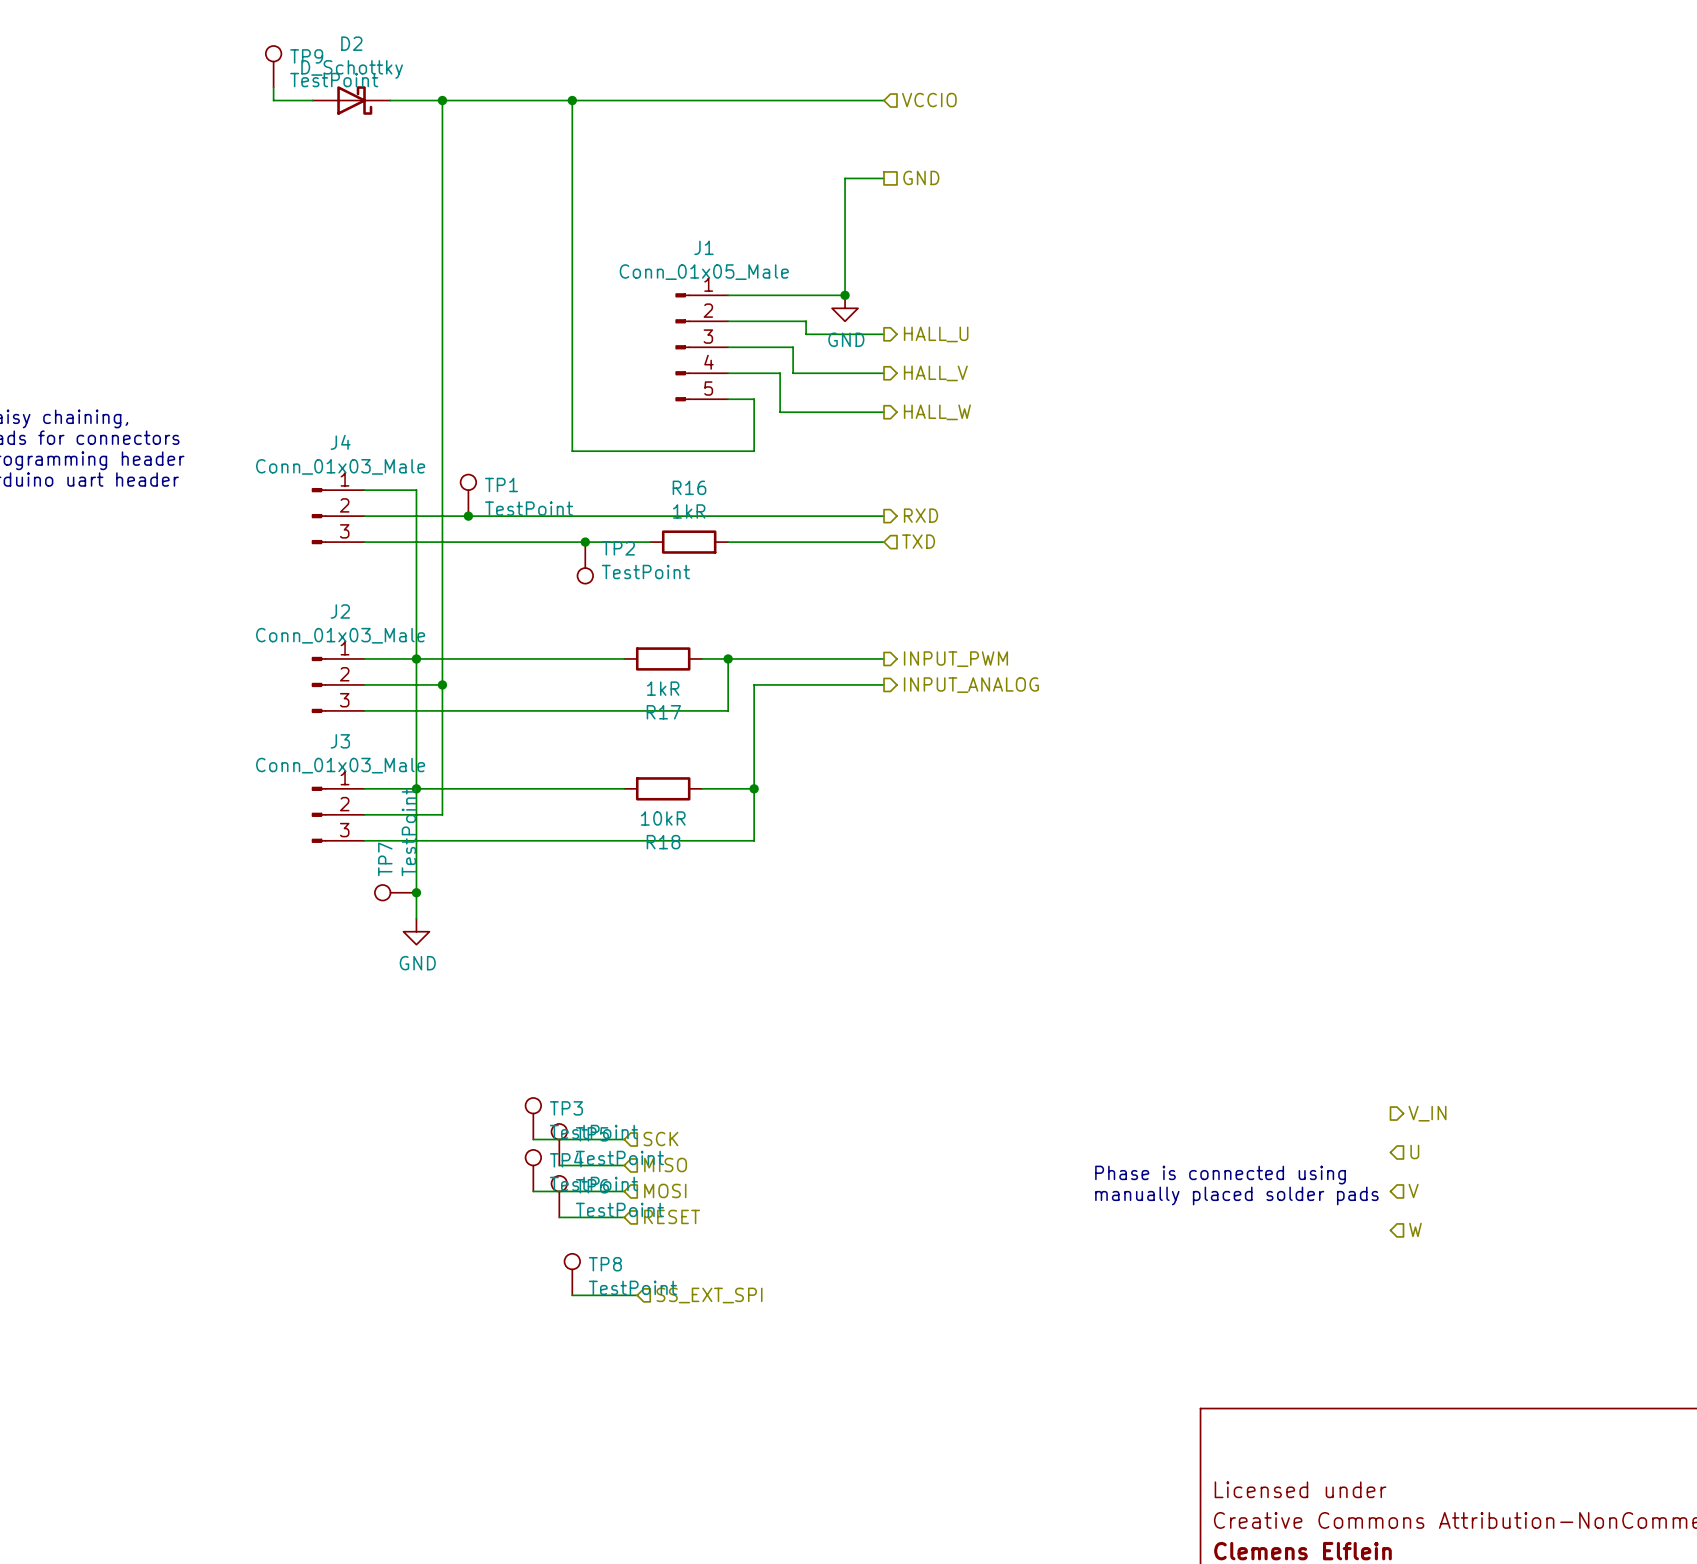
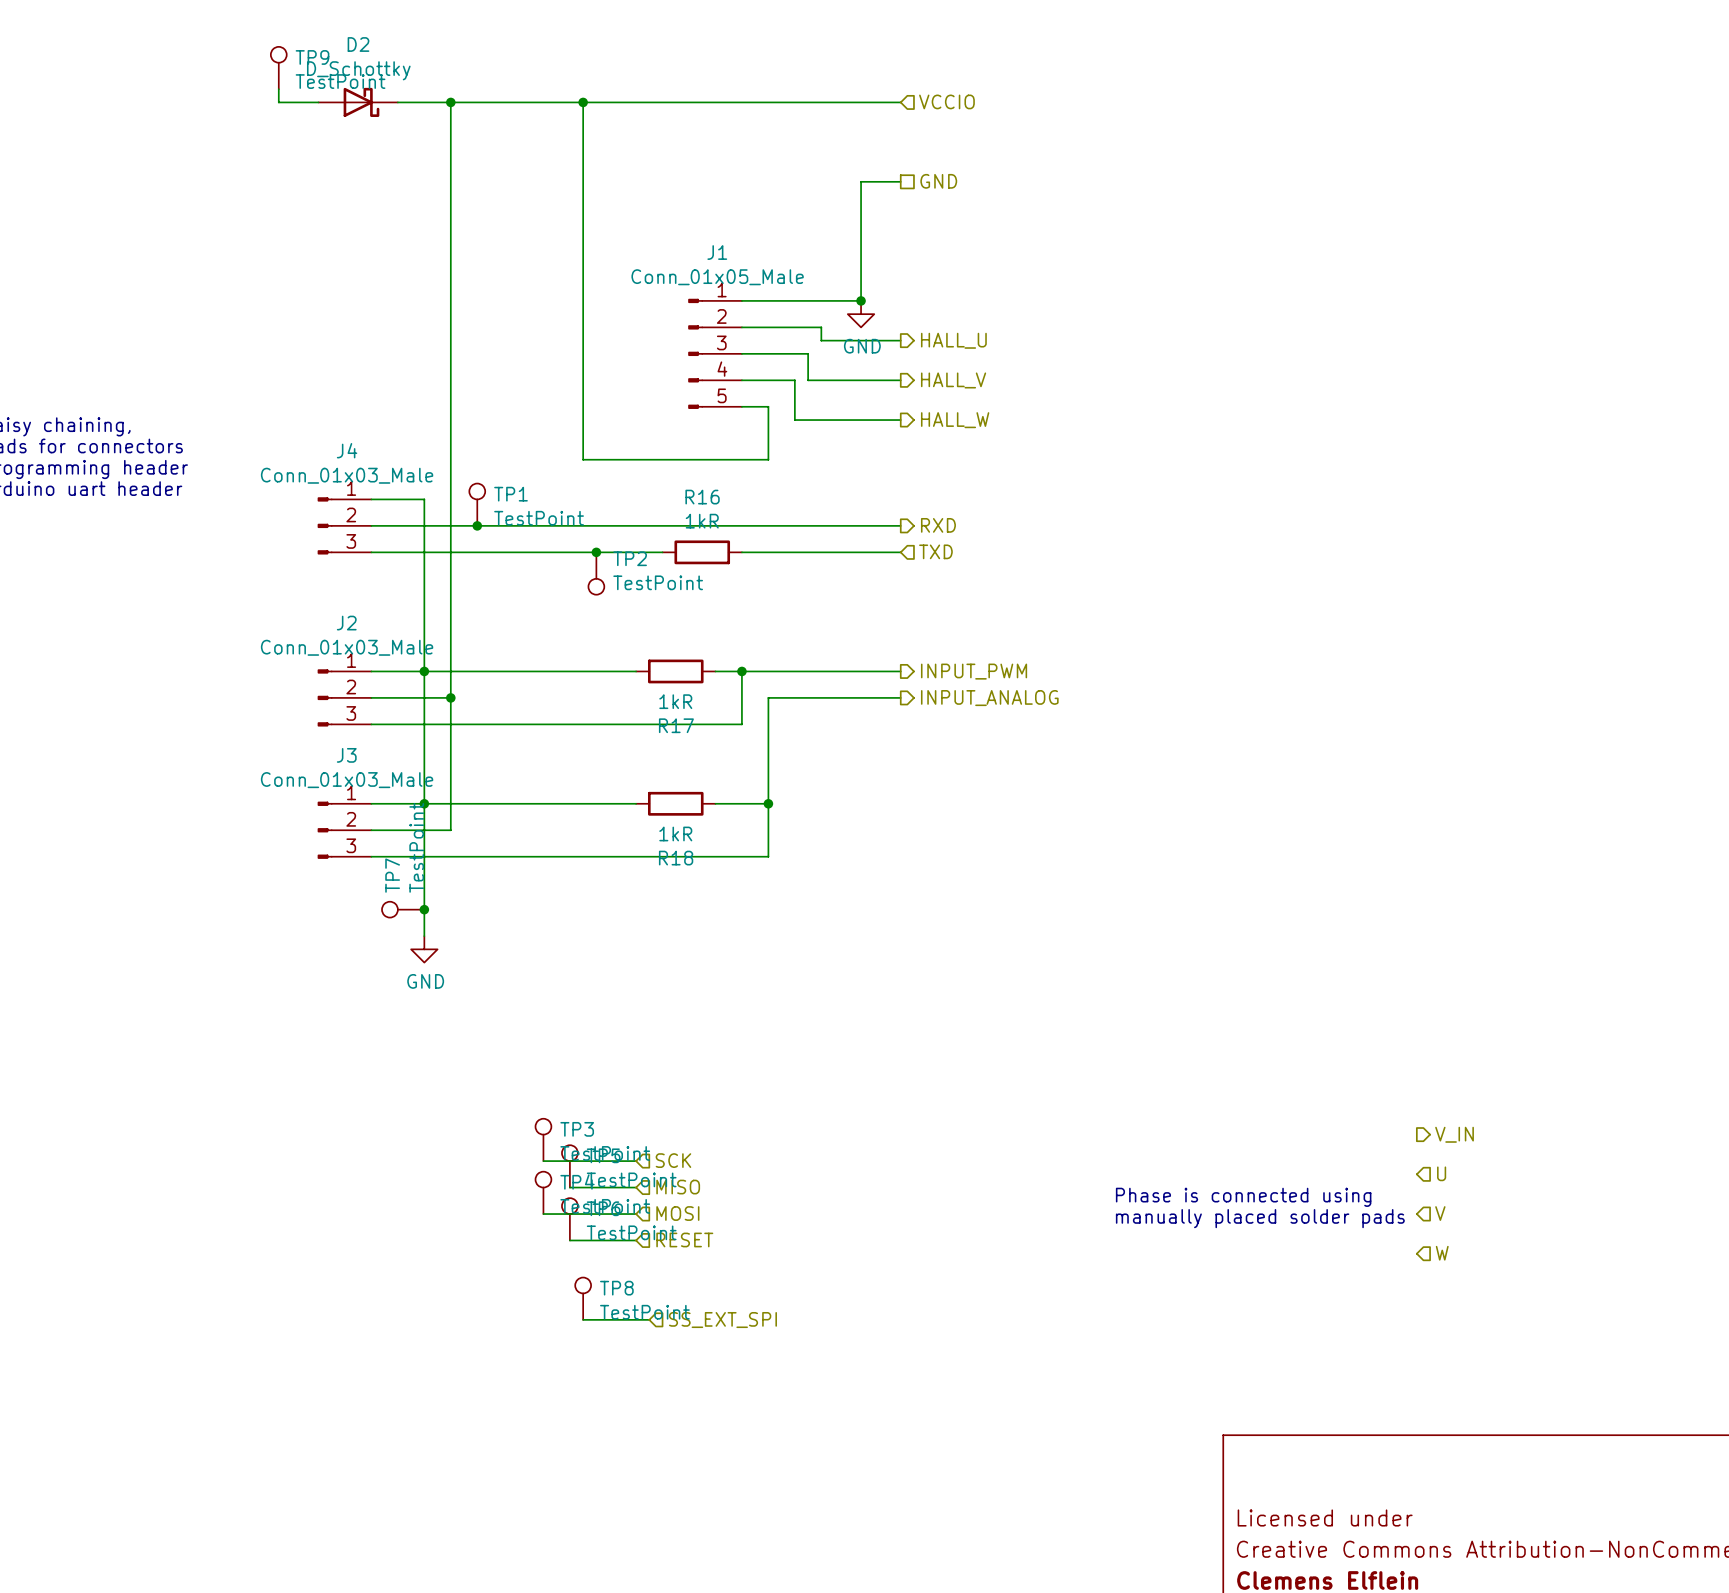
R18 value: 10kR (663, 818) -> 1kR (675, 833)

